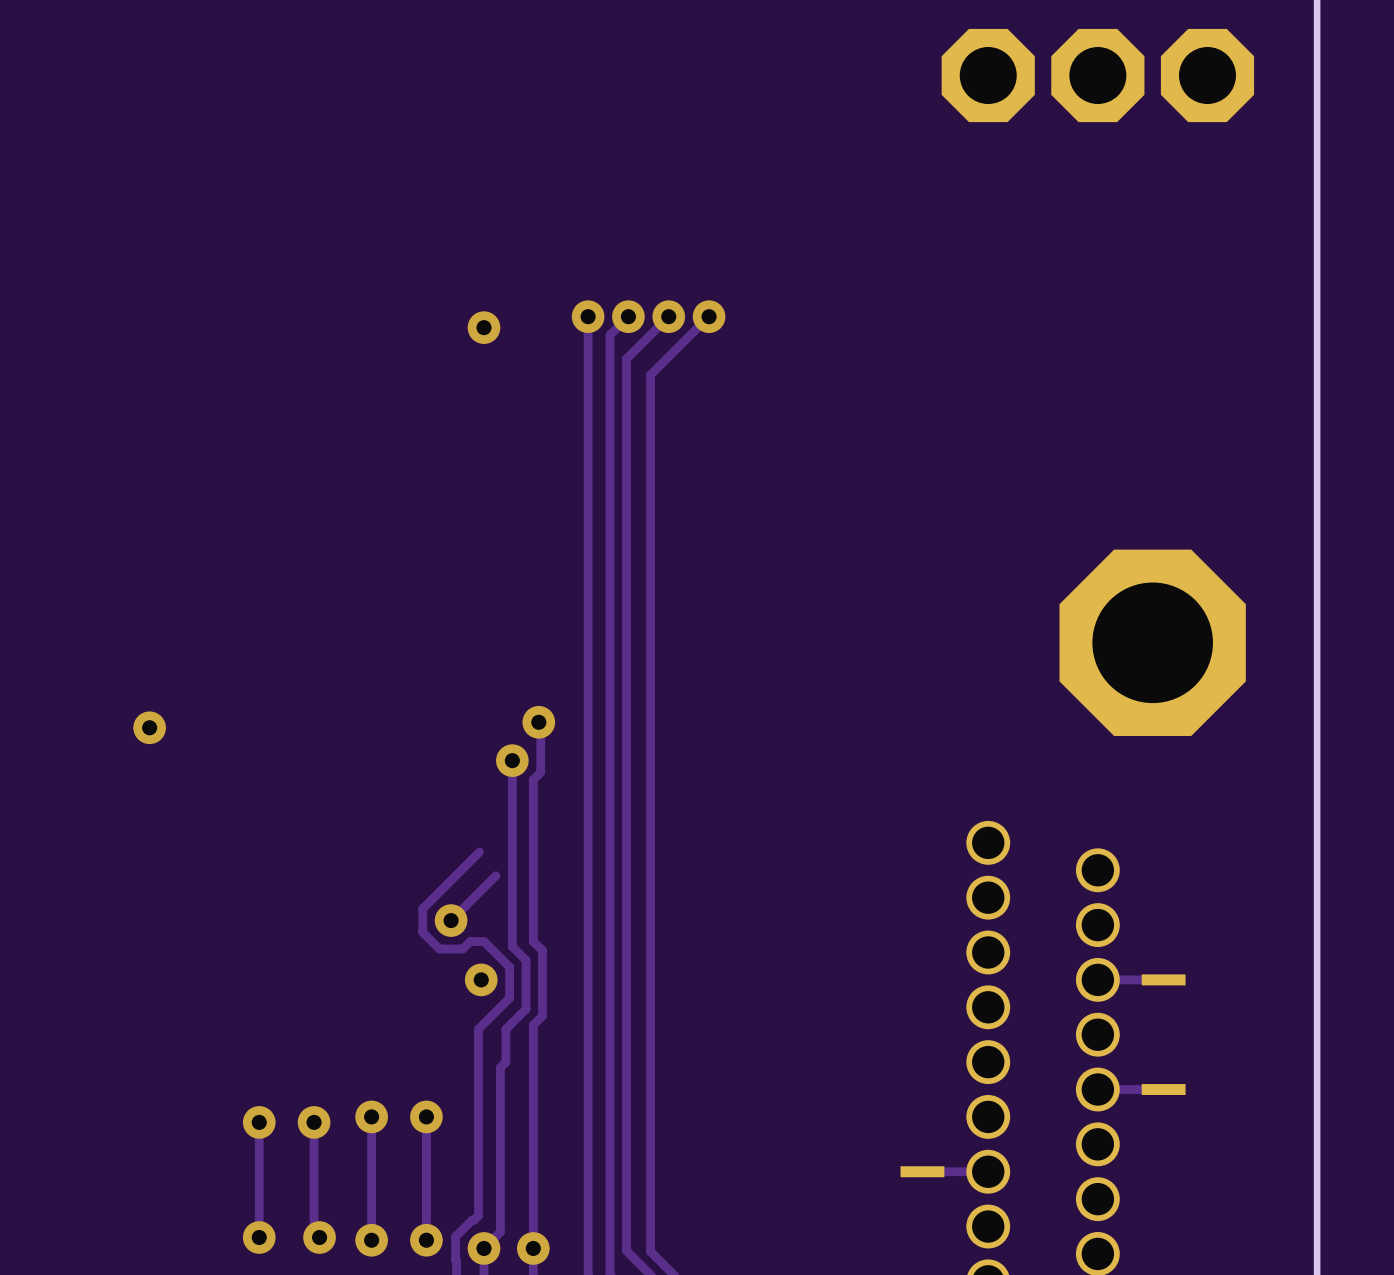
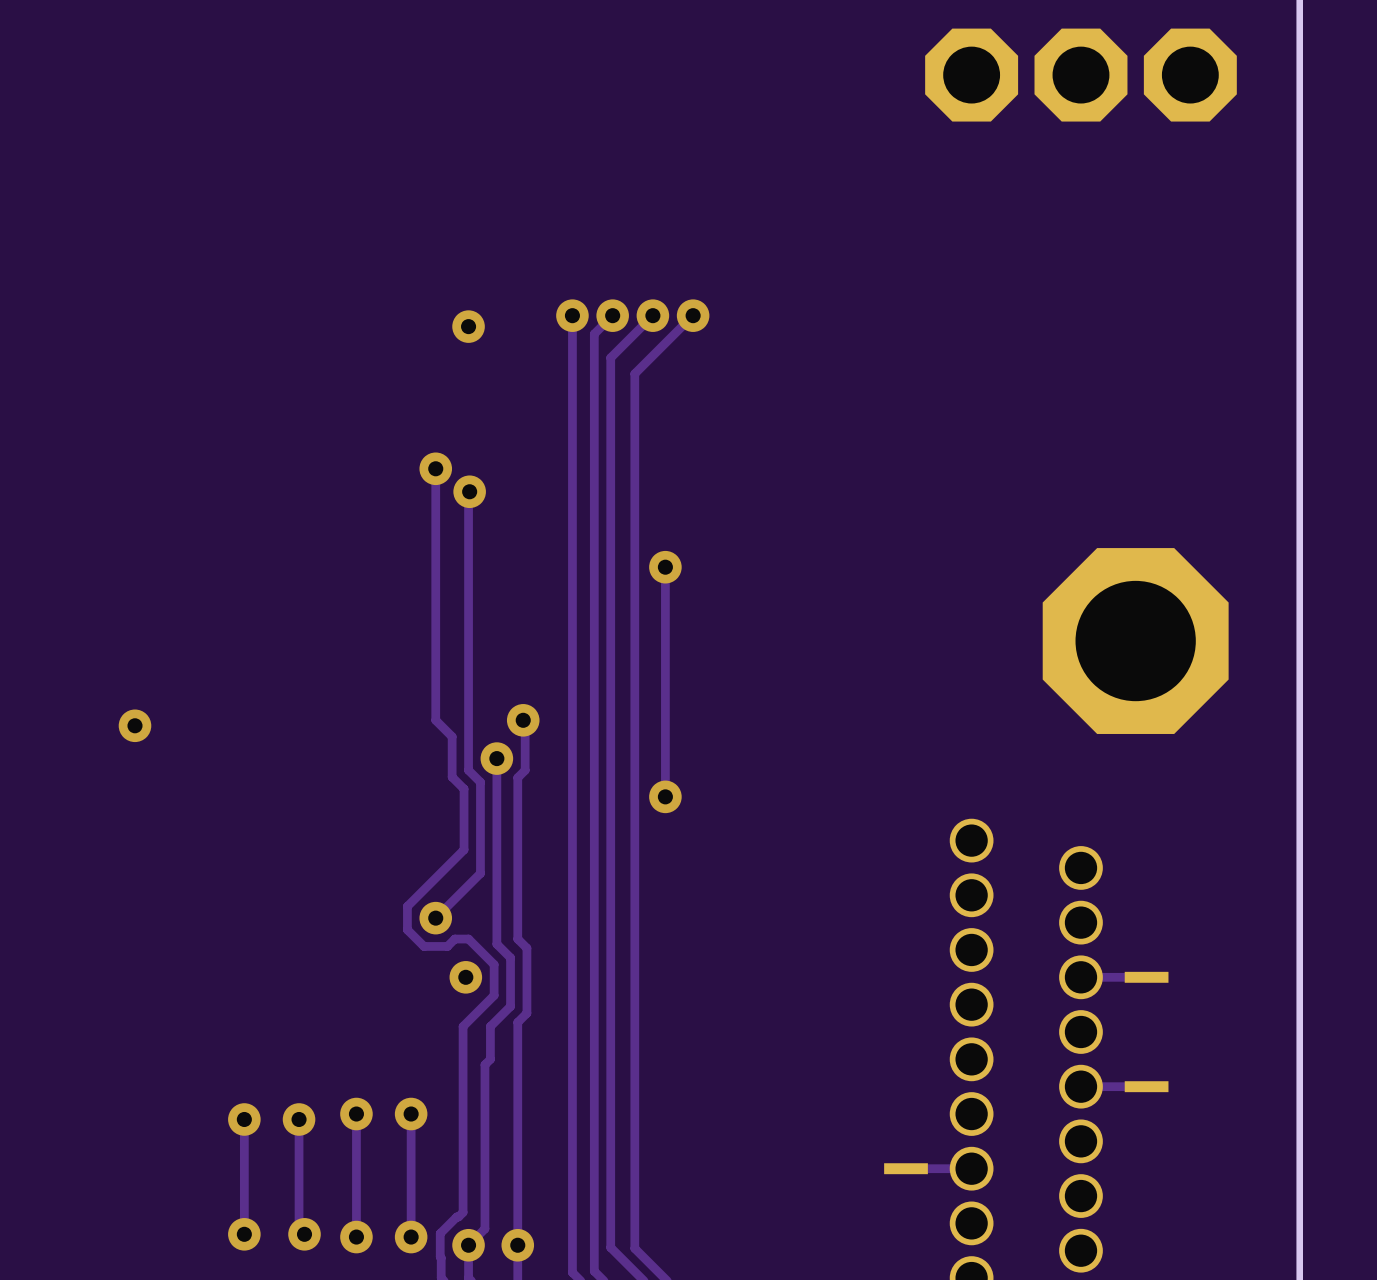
track: none -> (435, 468) (435, 720) (452, 736) (452, 777) (464, 789) (464, 849)
via: none -> (435, 468)
track: none -> (469, 491) (468, 770) (480, 782) (480, 873)
via: none -> (469, 491)
track: none -> (665, 567) (665, 796)
via: none -> (665, 567)
via: none -> (665, 796)

